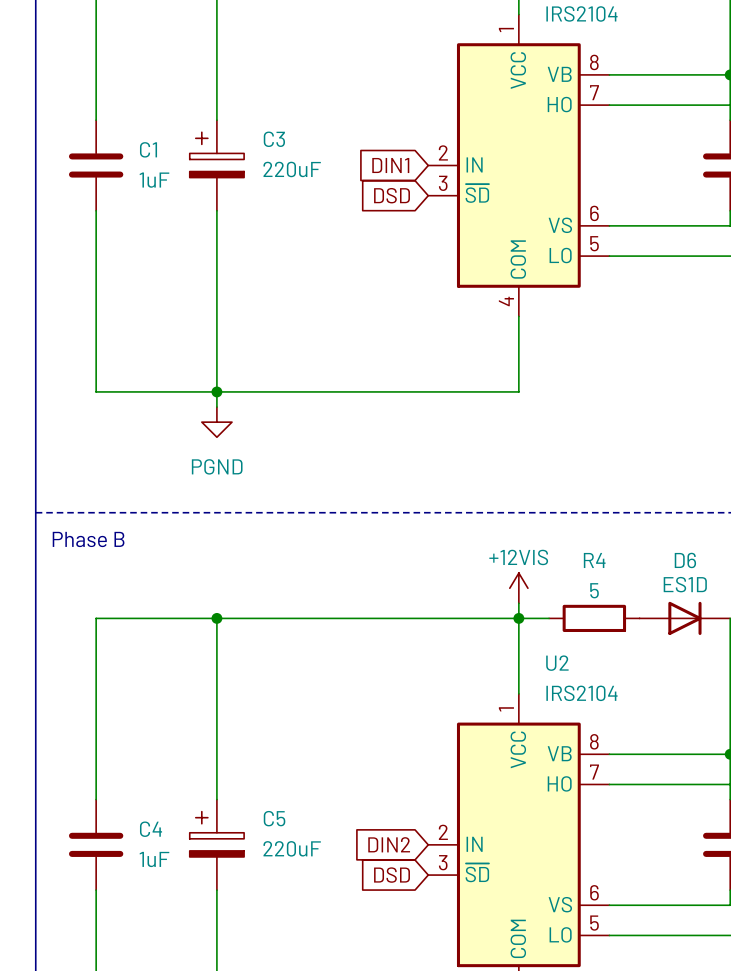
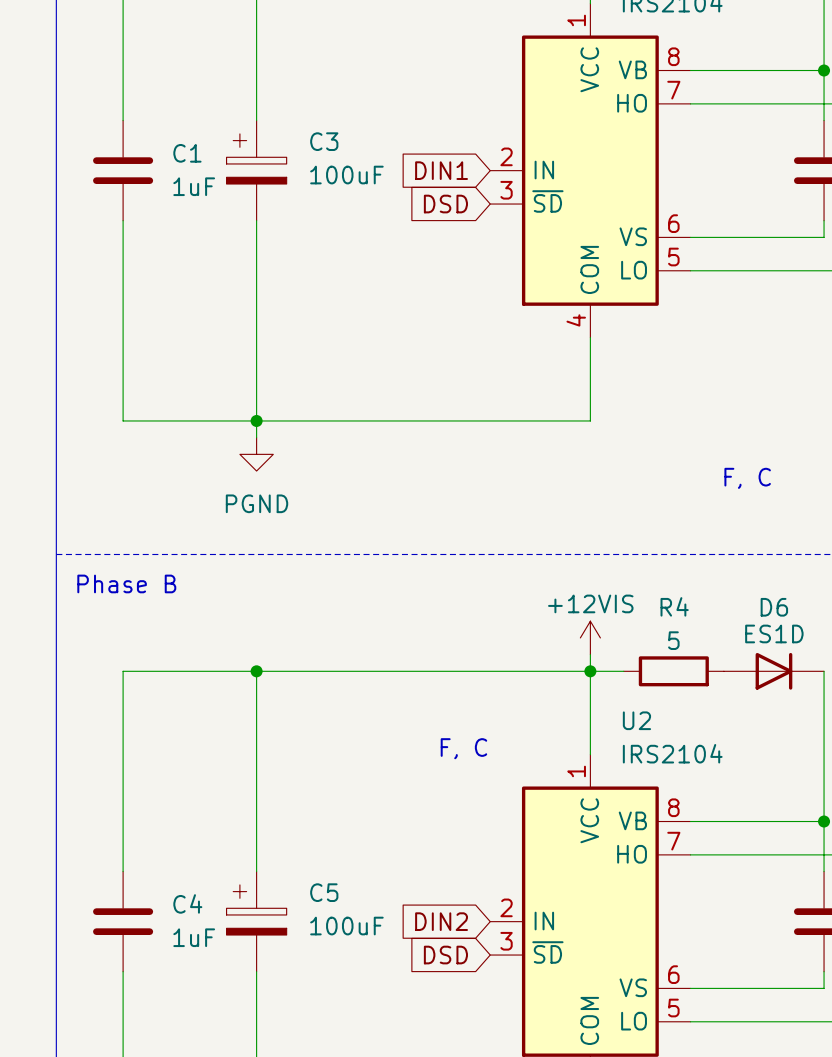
C3 value: 220uF (292, 169) -> 100uF (346, 175)
text: none -> F, C (747, 478)
text: none -> F, C (463, 748)
C5 value: 220uF (292, 848) -> 100uF (346, 926)

